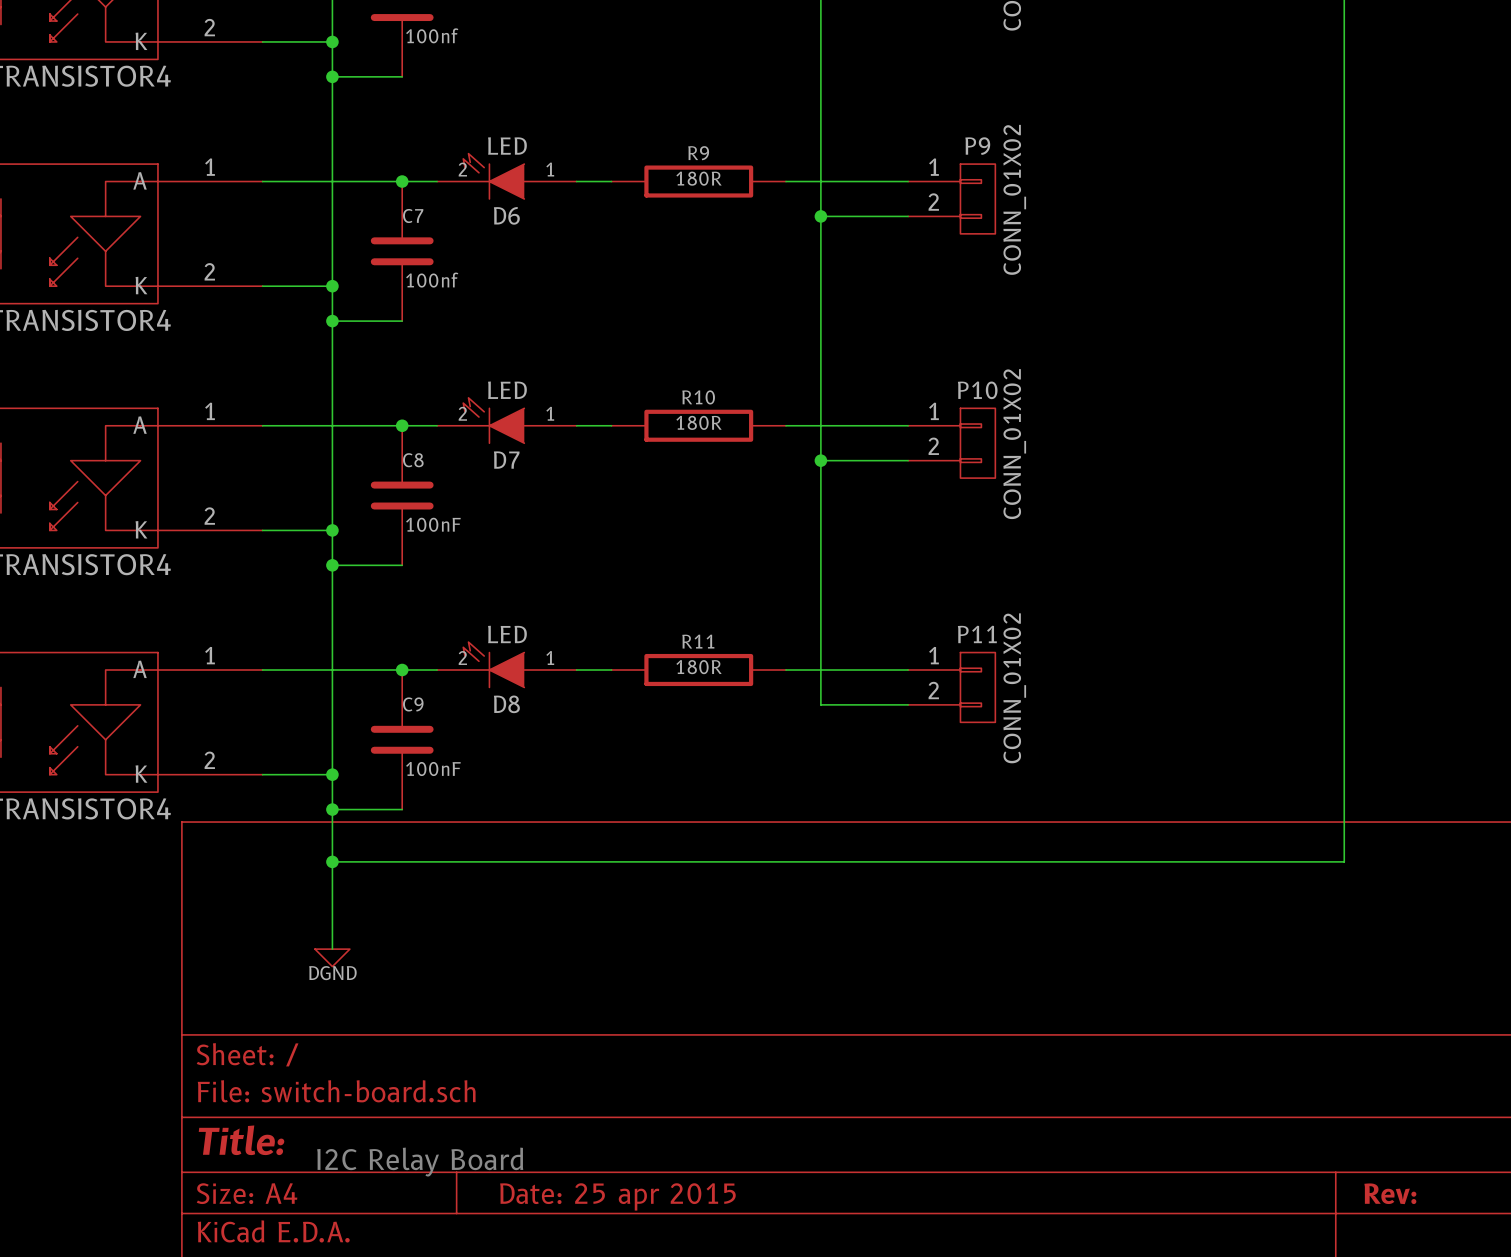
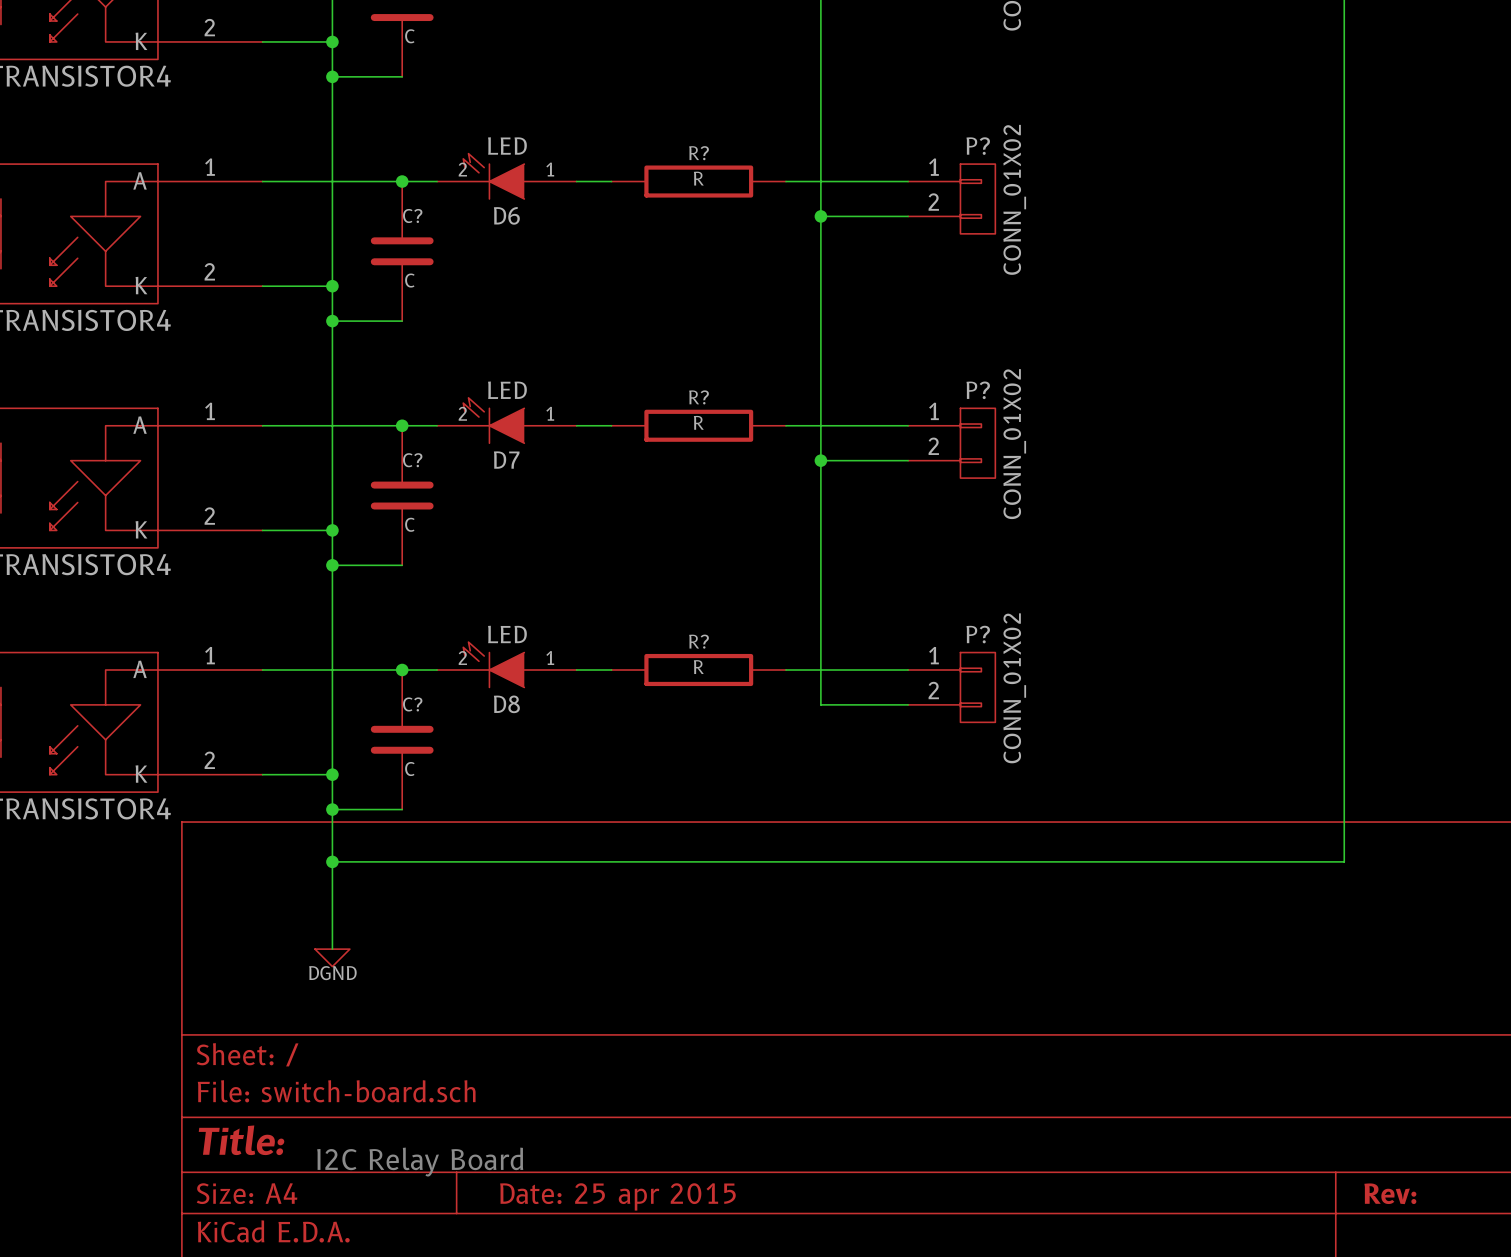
part value: 100nf (432, 35) -> C (409, 36)
P9 name: P9 (977, 146) -> P? (978, 146)
R9 name: R9 (698, 153) -> R? (699, 153)
R9 value: 180R (699, 178) -> R (698, 178)
C7 name: C7 (413, 215) -> C? (412, 215)
C7 value: 100nf (432, 280) -> C (409, 280)
P10 name: P10 (977, 390) -> P? (978, 390)
R10 name: R10 (698, 397) -> R? (699, 397)
R10 value: 180R (699, 422) -> R (698, 422)
C8 name: C8 (413, 460) -> C? (412, 460)
C8 value: 100nF (433, 524) -> C (409, 524)
P11 name: P11 (977, 634) -> P? (978, 634)
R11 name: R11 (698, 641) -> R? (699, 641)
R11 value: 180R (699, 667) -> R (698, 667)
C9 name: C9 (413, 704) -> C? (412, 704)
C9 value: 100nF (433, 768) -> C (409, 769)

